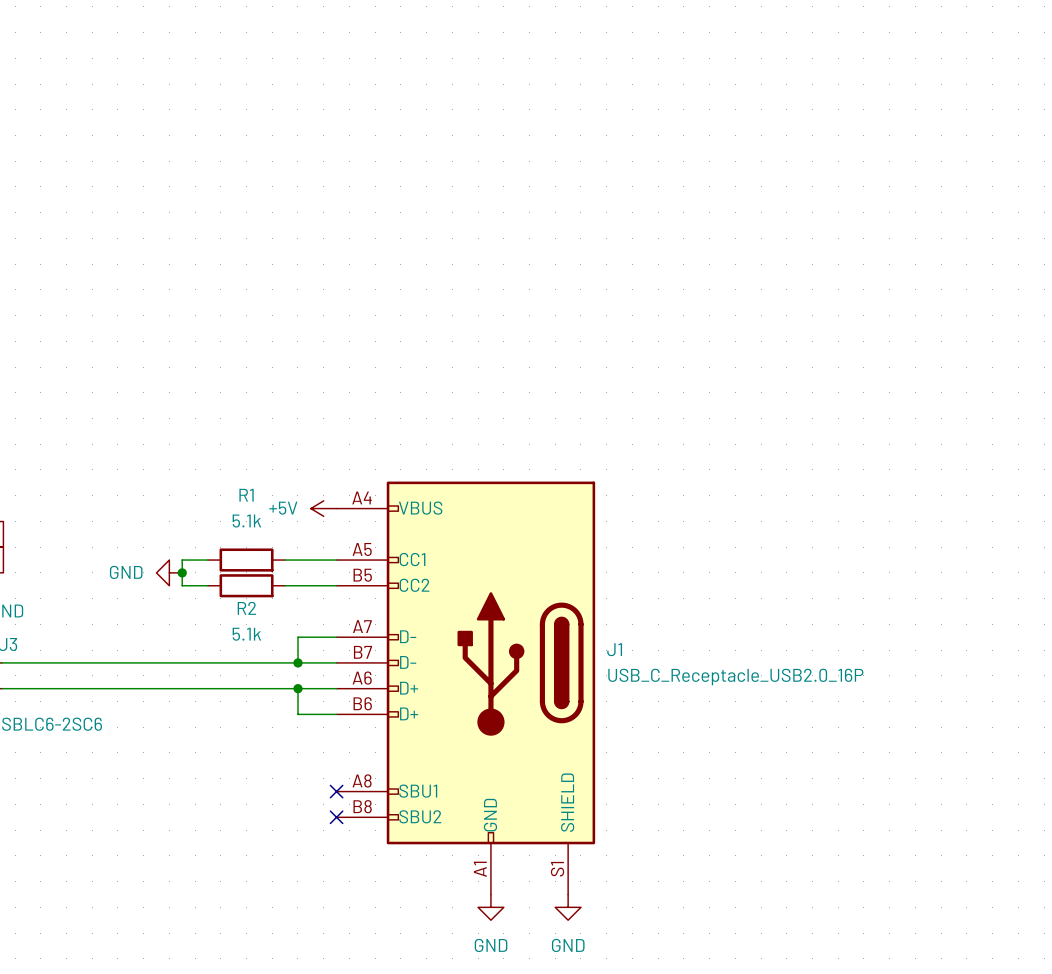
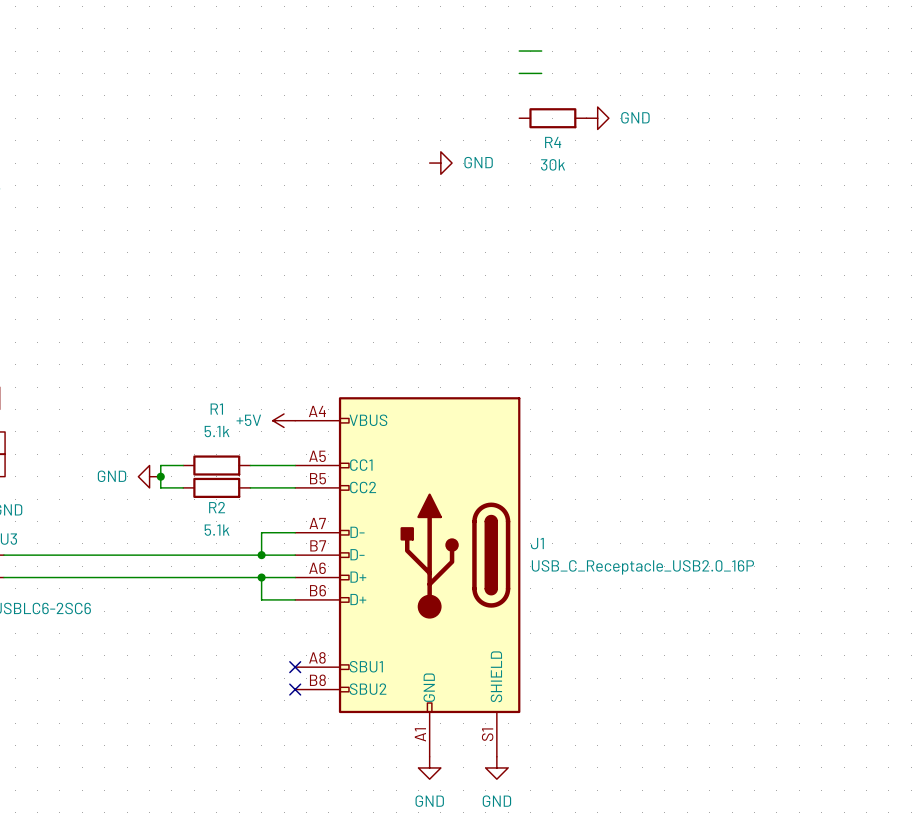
wire: none -> (519, 51) (541, 51)
wire: none -> (519, 73) (541, 73)
R4: none -> 30k (552, 118)
power symbol: none -> GND (597, 118)
power symbol: none -> GND (440, 163)

